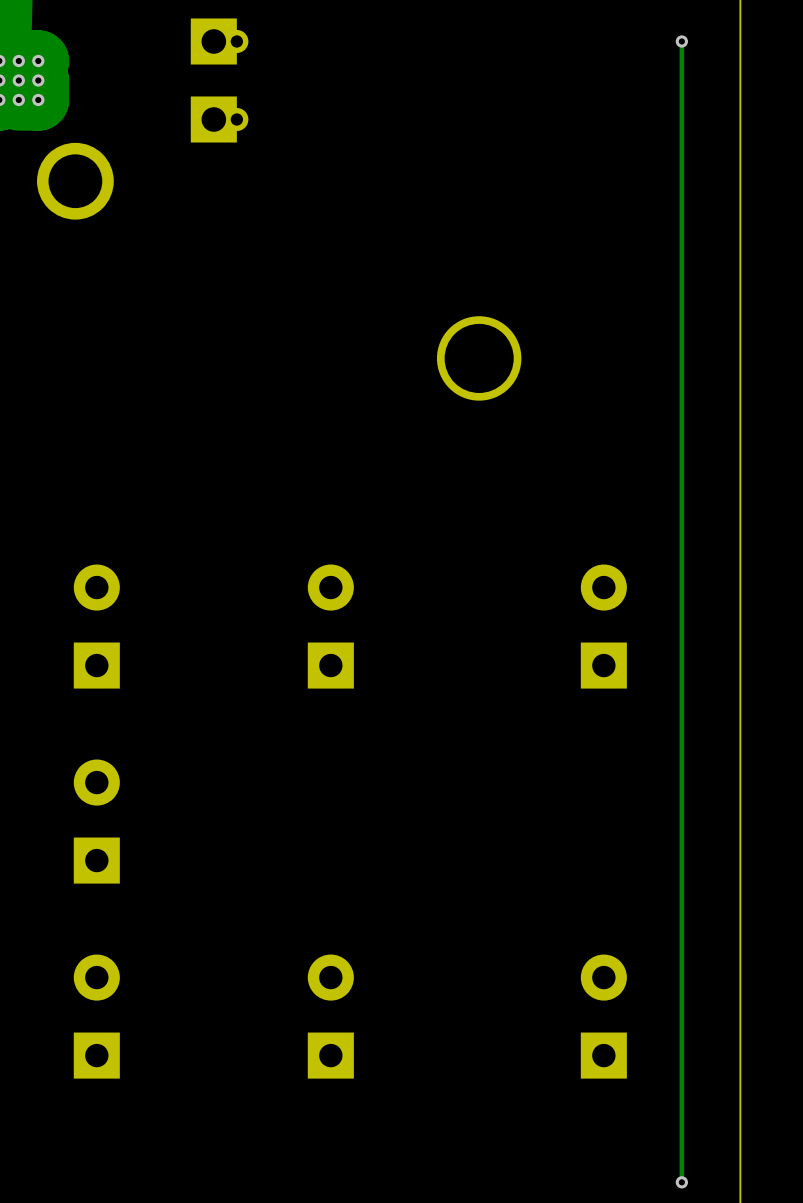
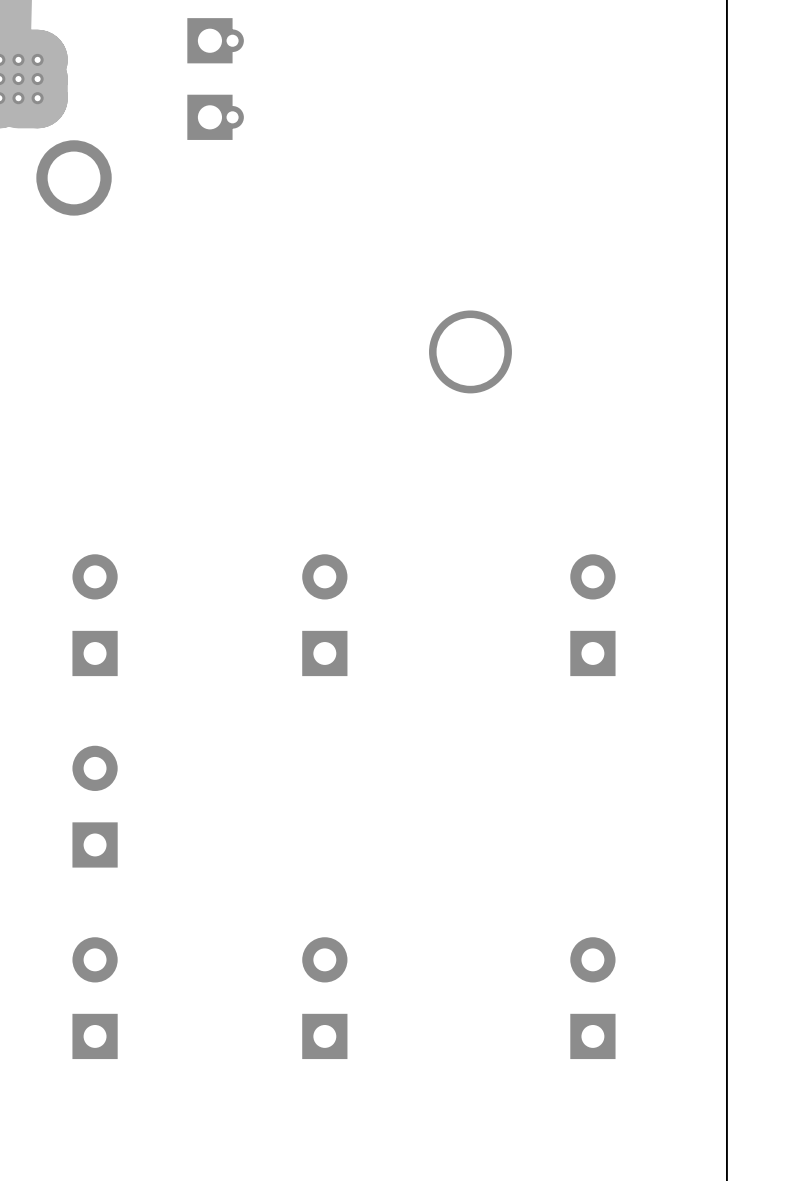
track: (681, 41) (681, 1182) -> none
via: (681, 41) -> none
via: (681, 1182) -> none

